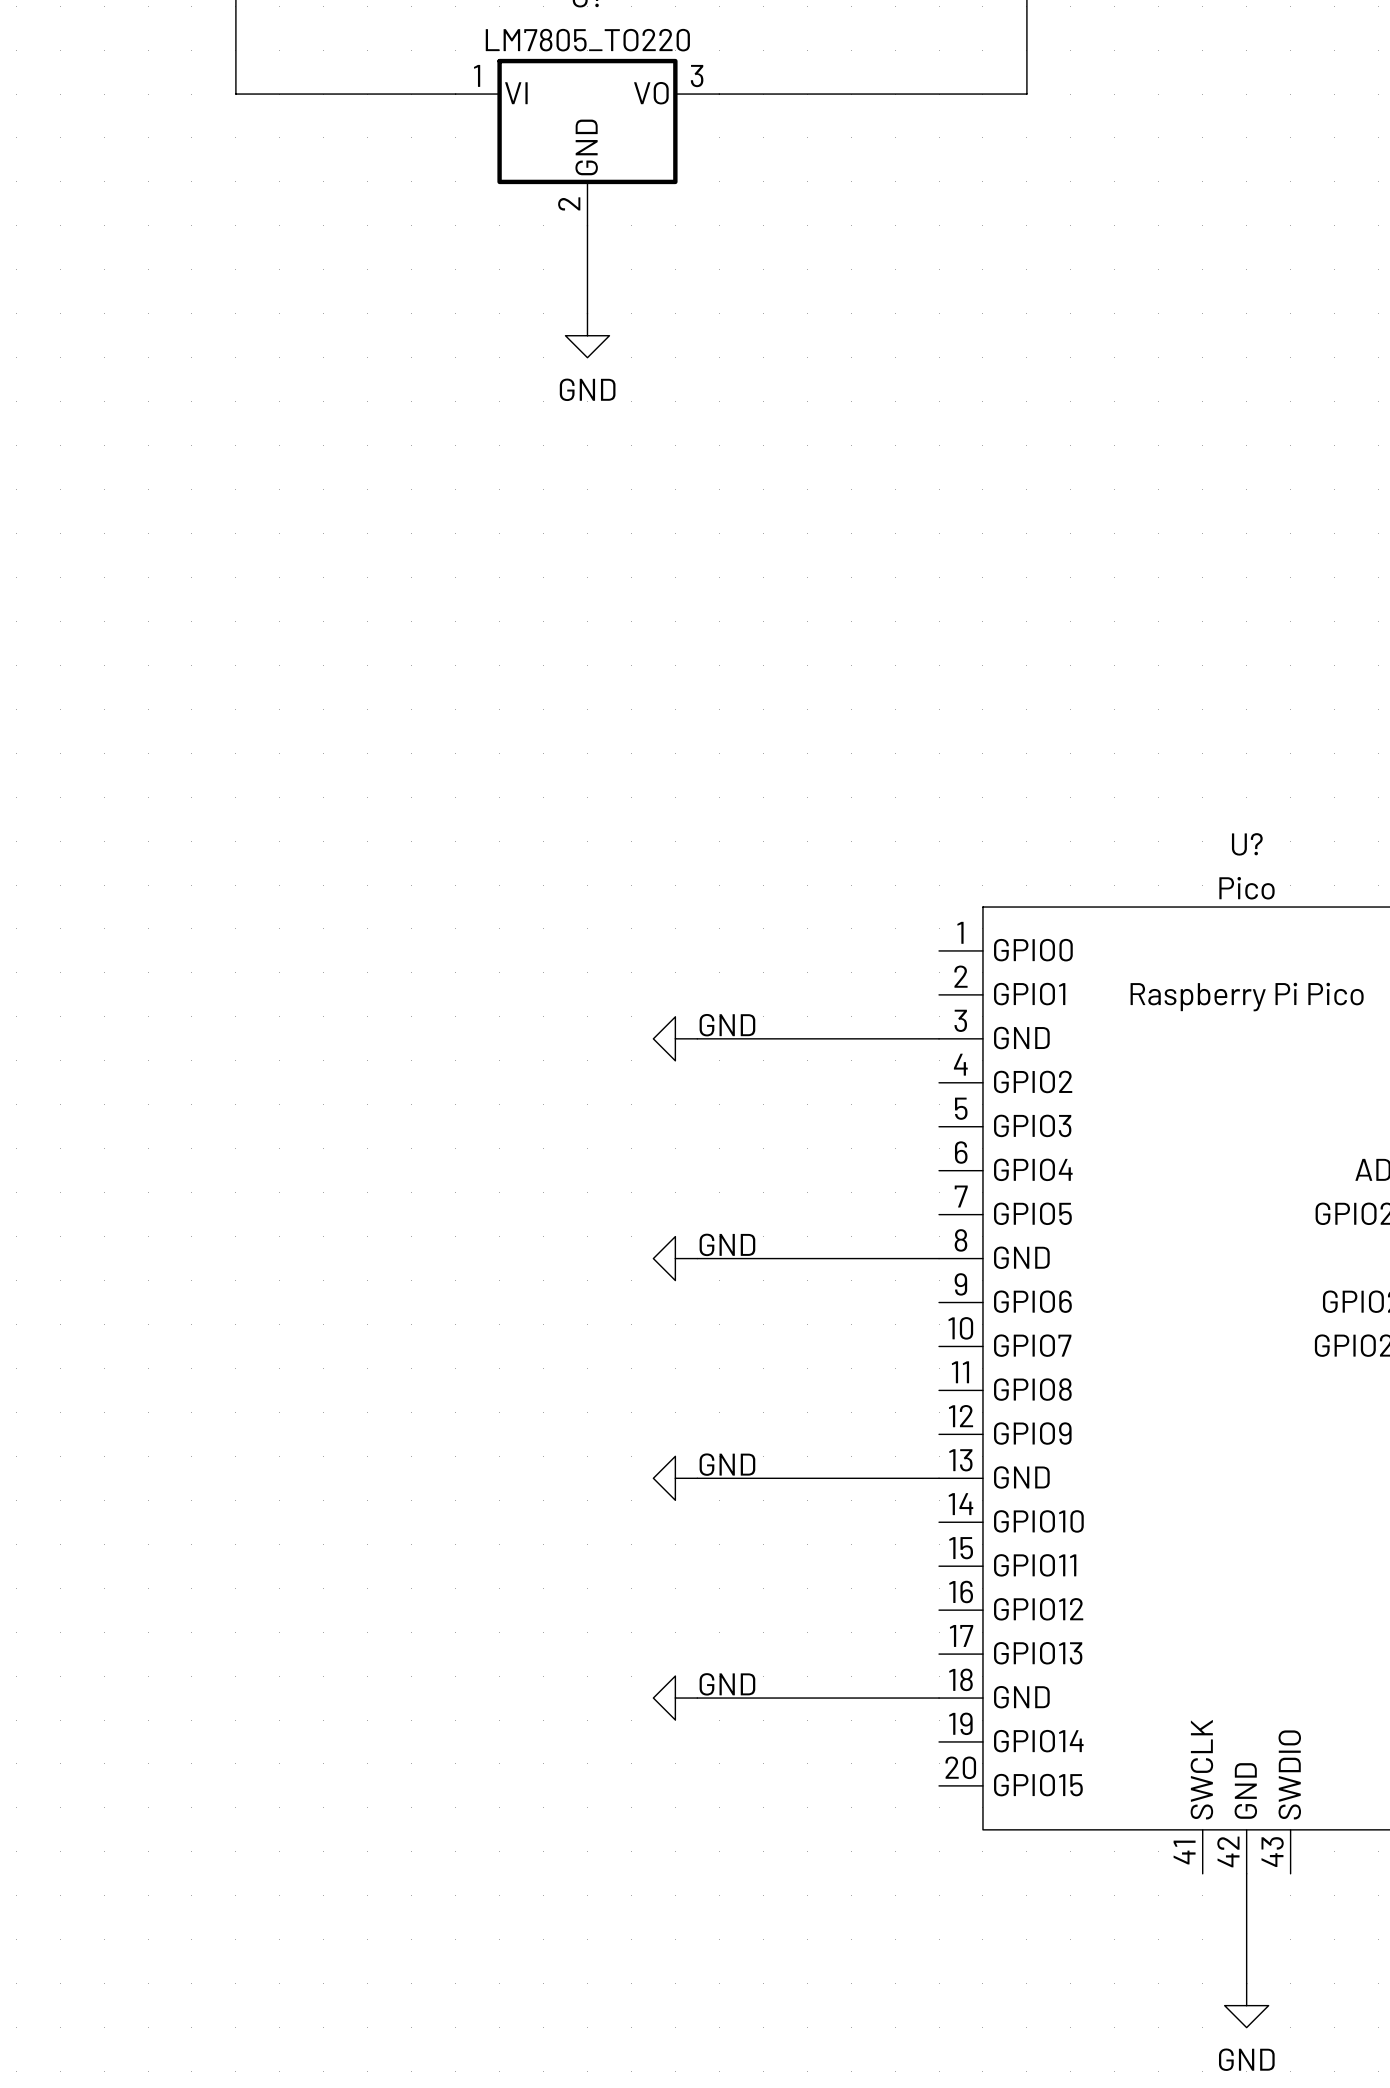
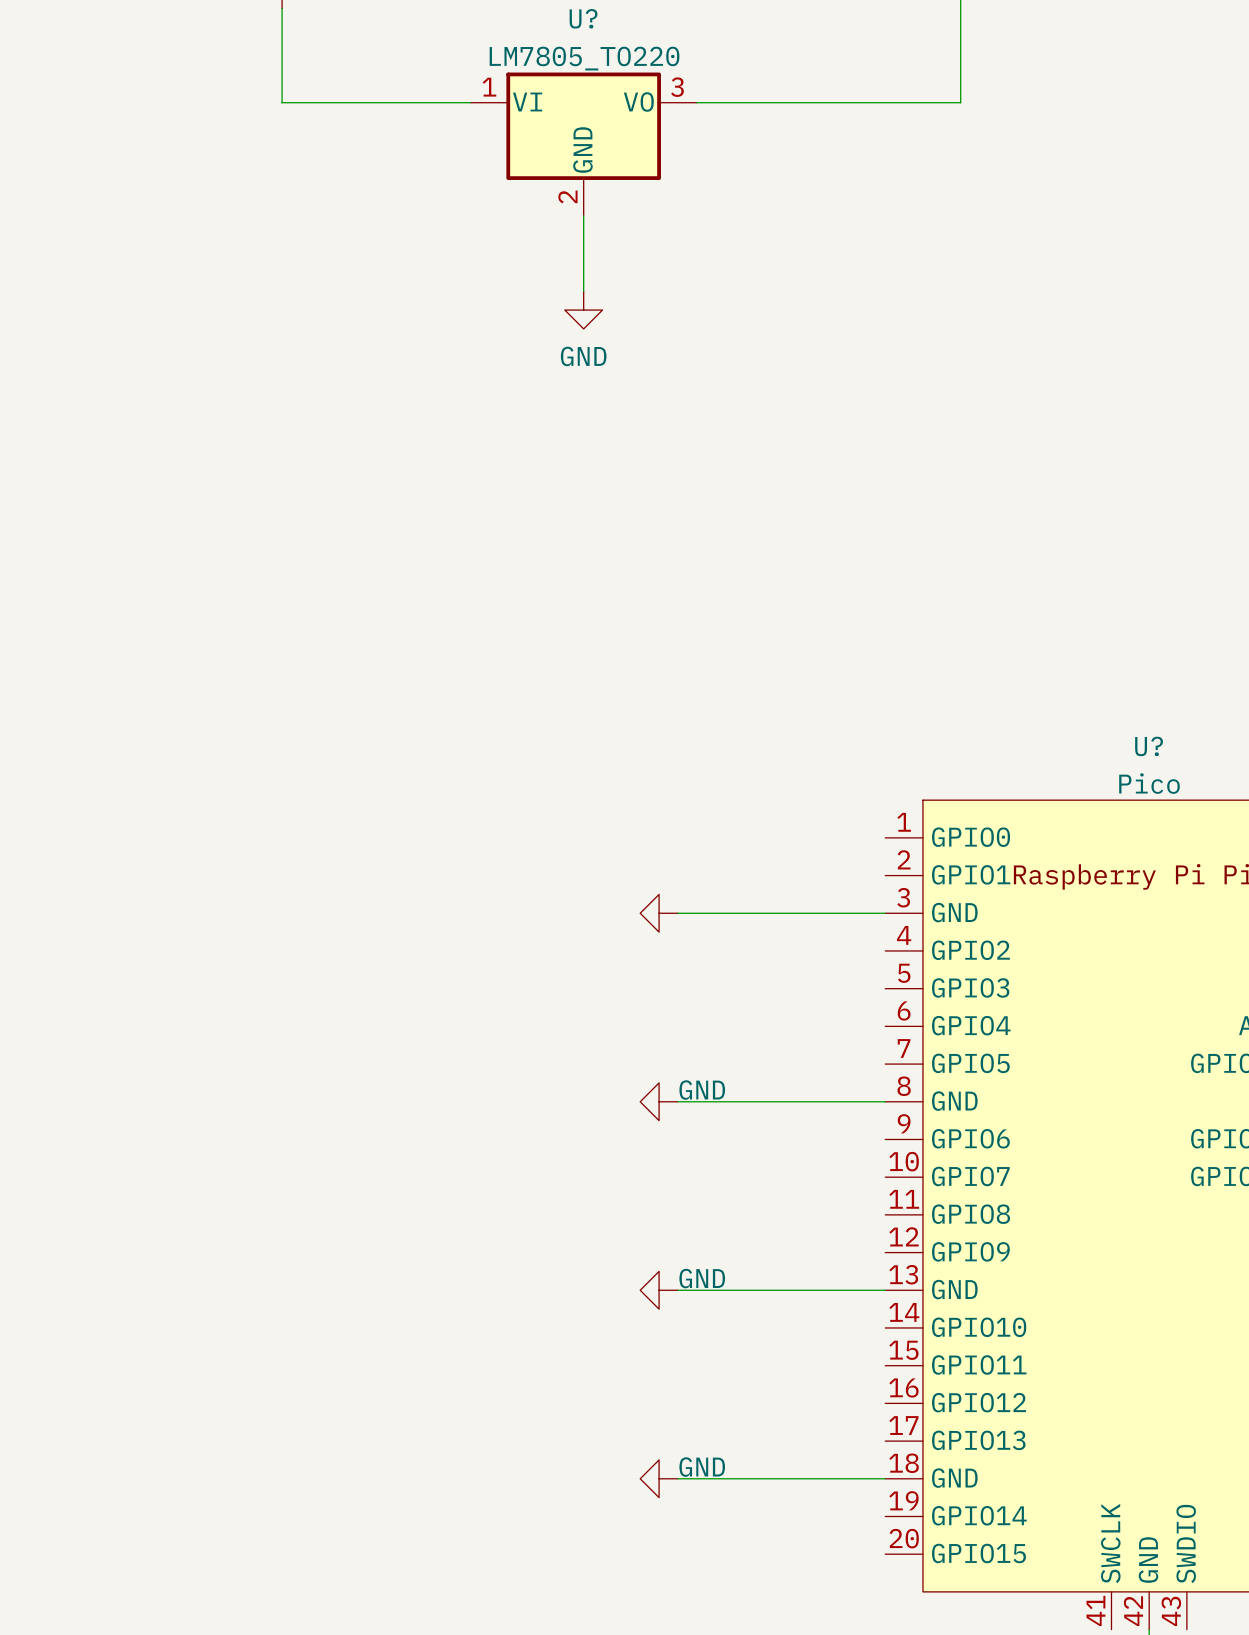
power symbol text: GND (727, 1025) -> none

